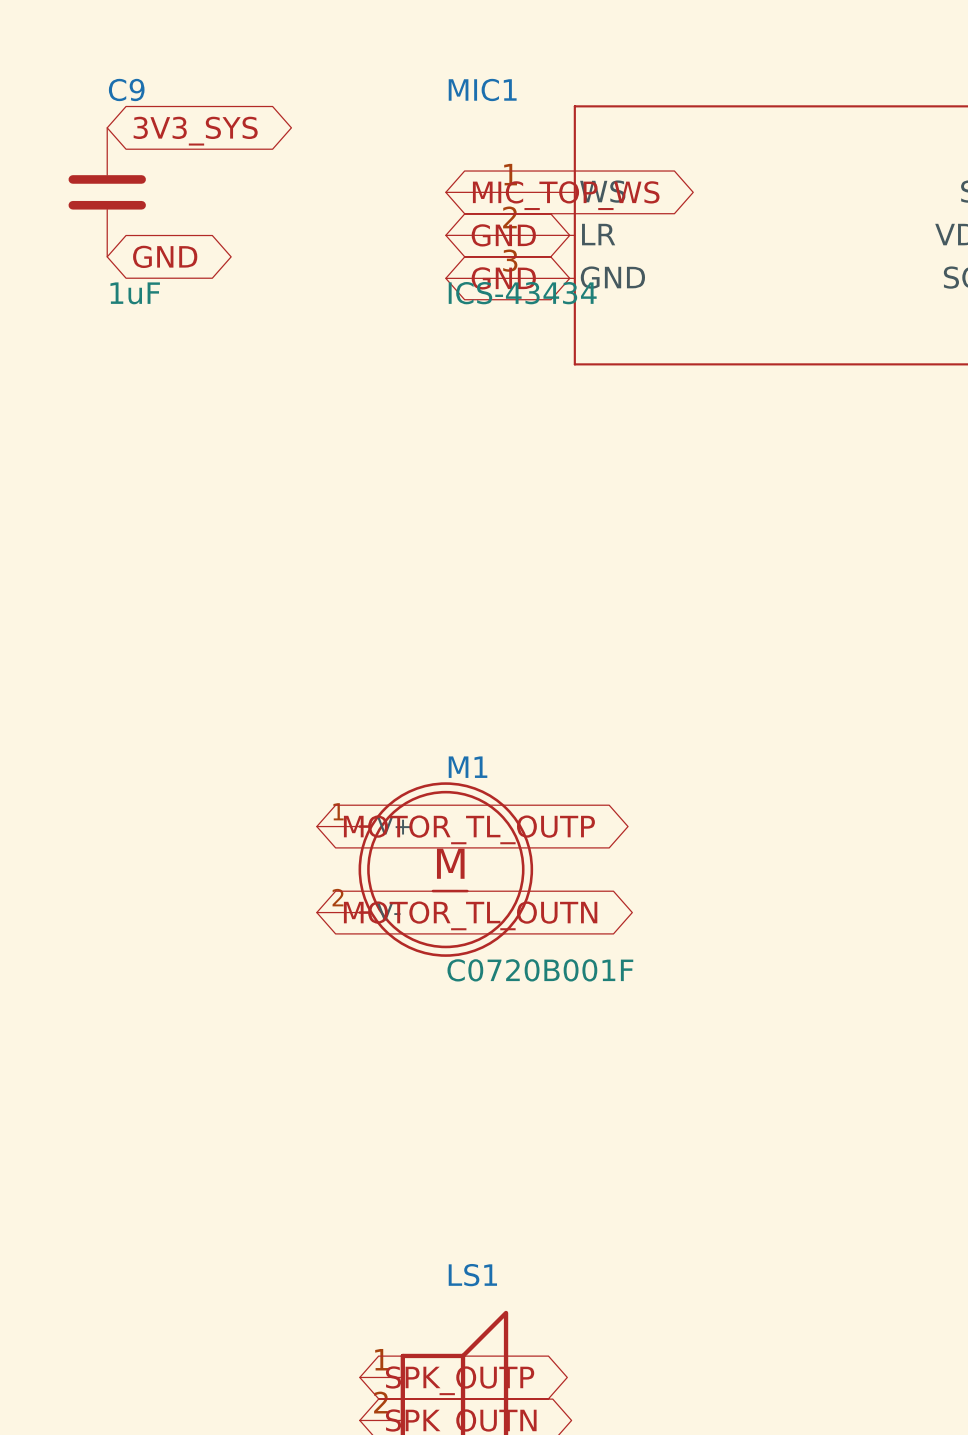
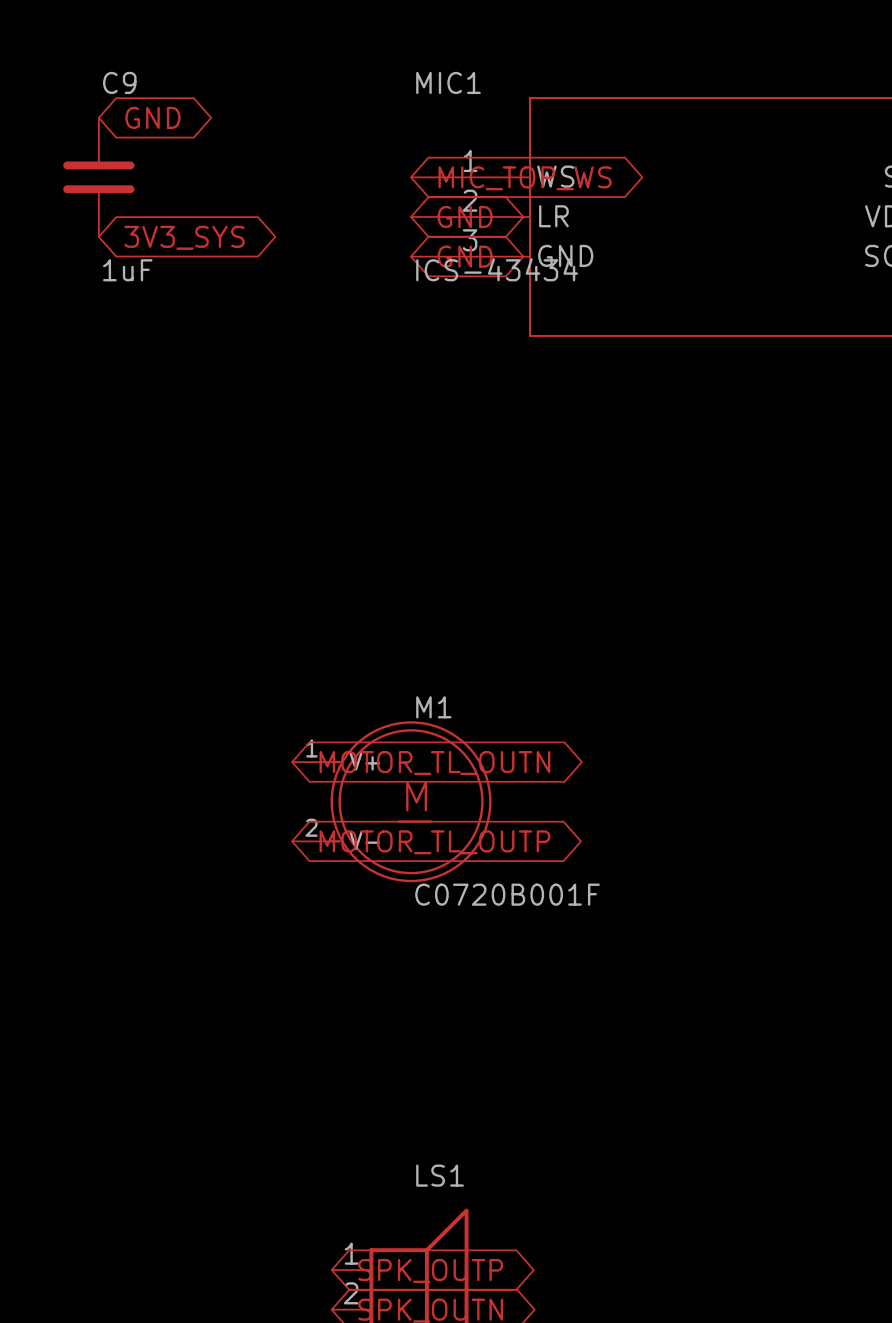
global label: 3V3_SYS (195, 131) -> GND (152, 117)
global label: GND (165, 256) -> 3V3_SYS (184, 237)
global label: MOTOR_TL_OUTP (469, 829) -> MOTOR_TL_OUTN (434, 763)
global label: MOTOR_TL_OUTN (470, 915) -> MOTOR_TL_OUTP (434, 842)

